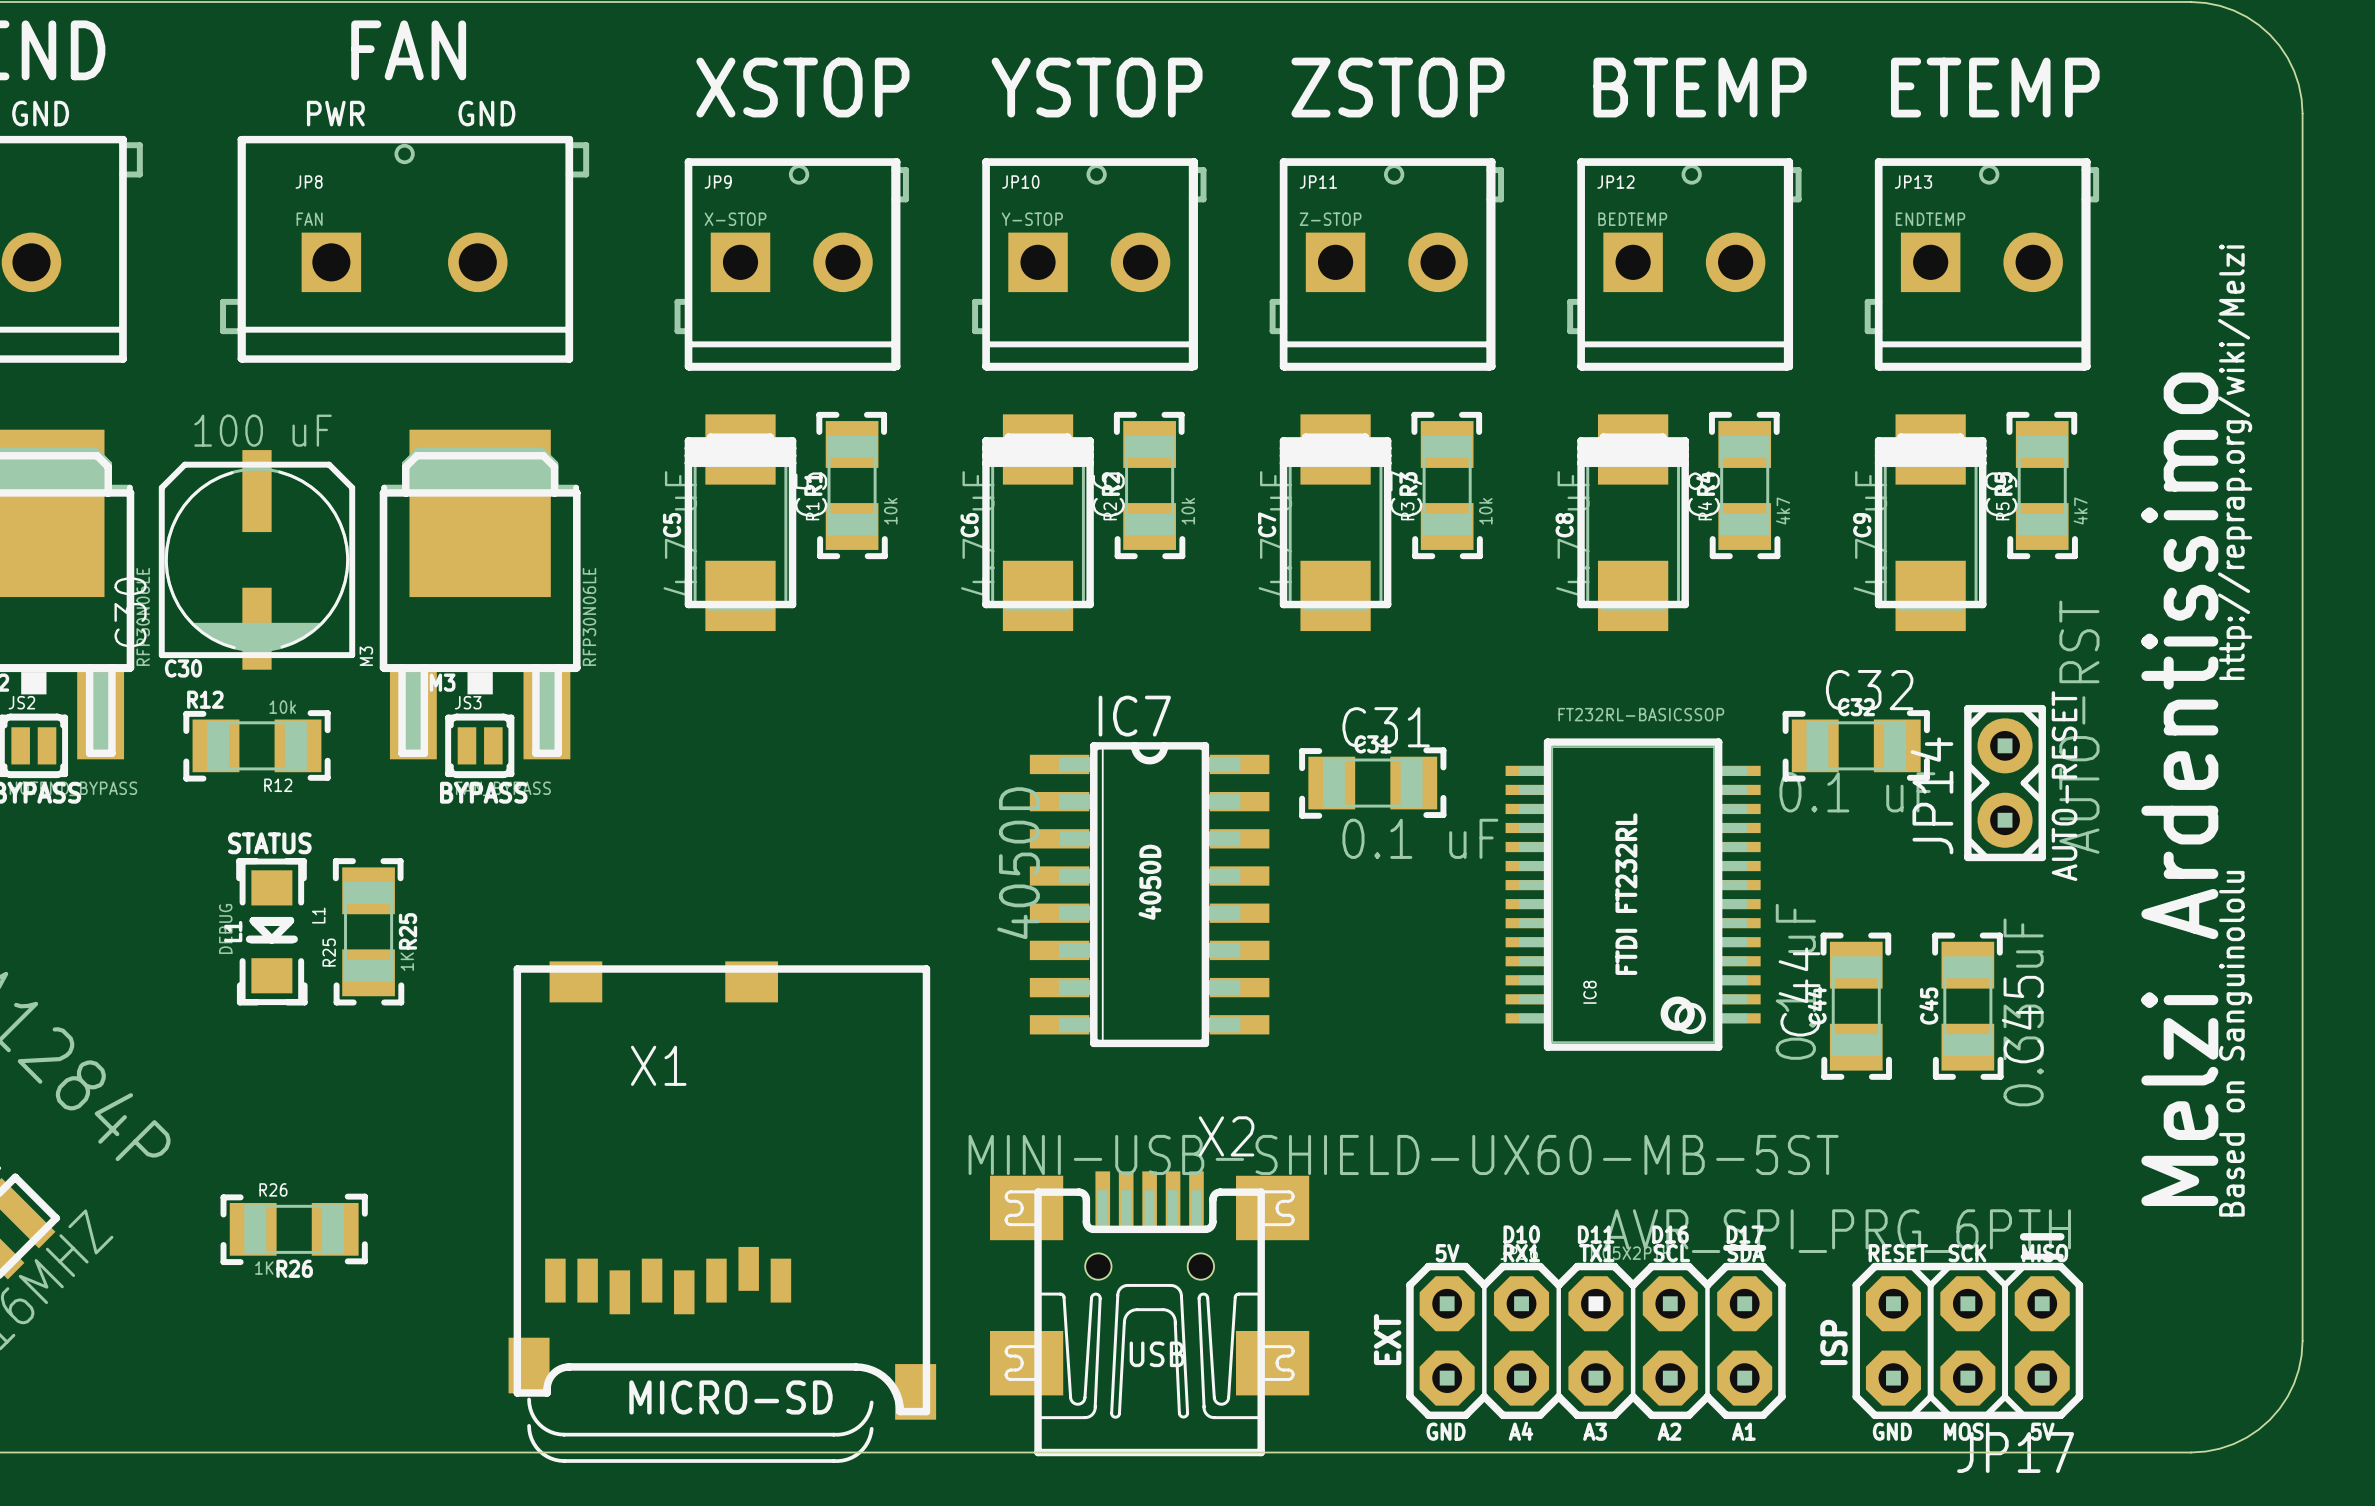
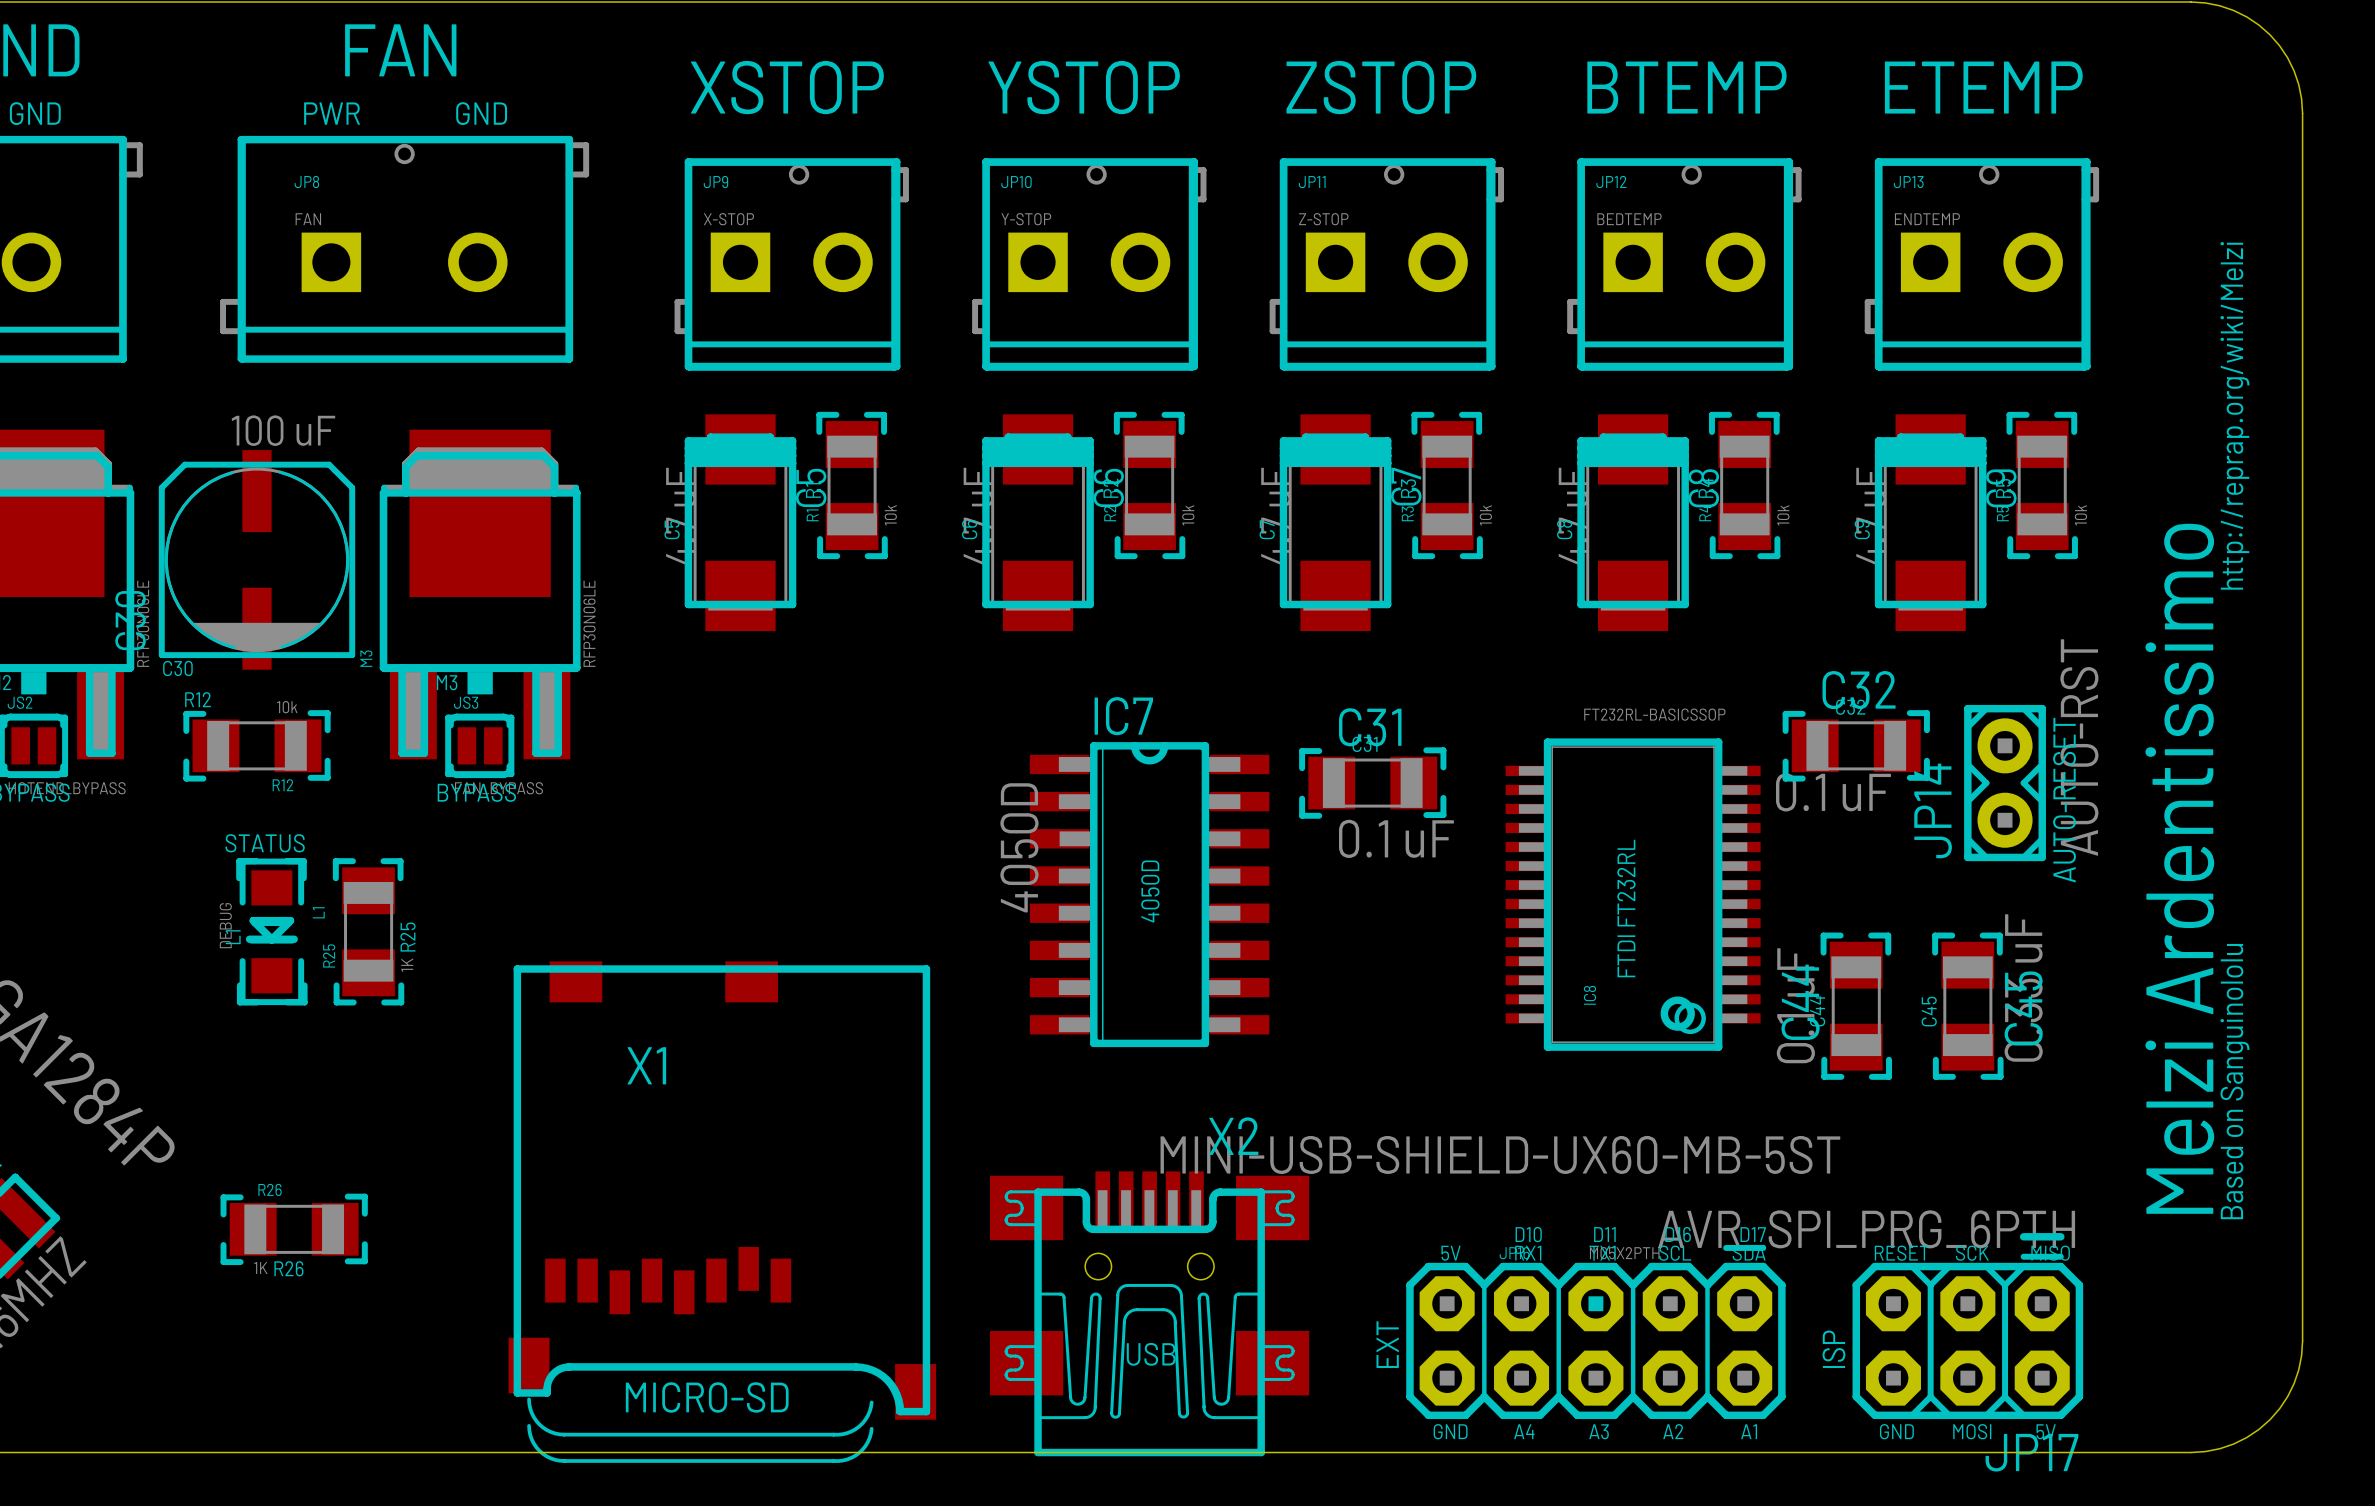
R4 value: 4k7 (1783, 511) -> 10k (1783, 515)
R5 value: 4k7 (2080, 511) -> 10k (2080, 515)

